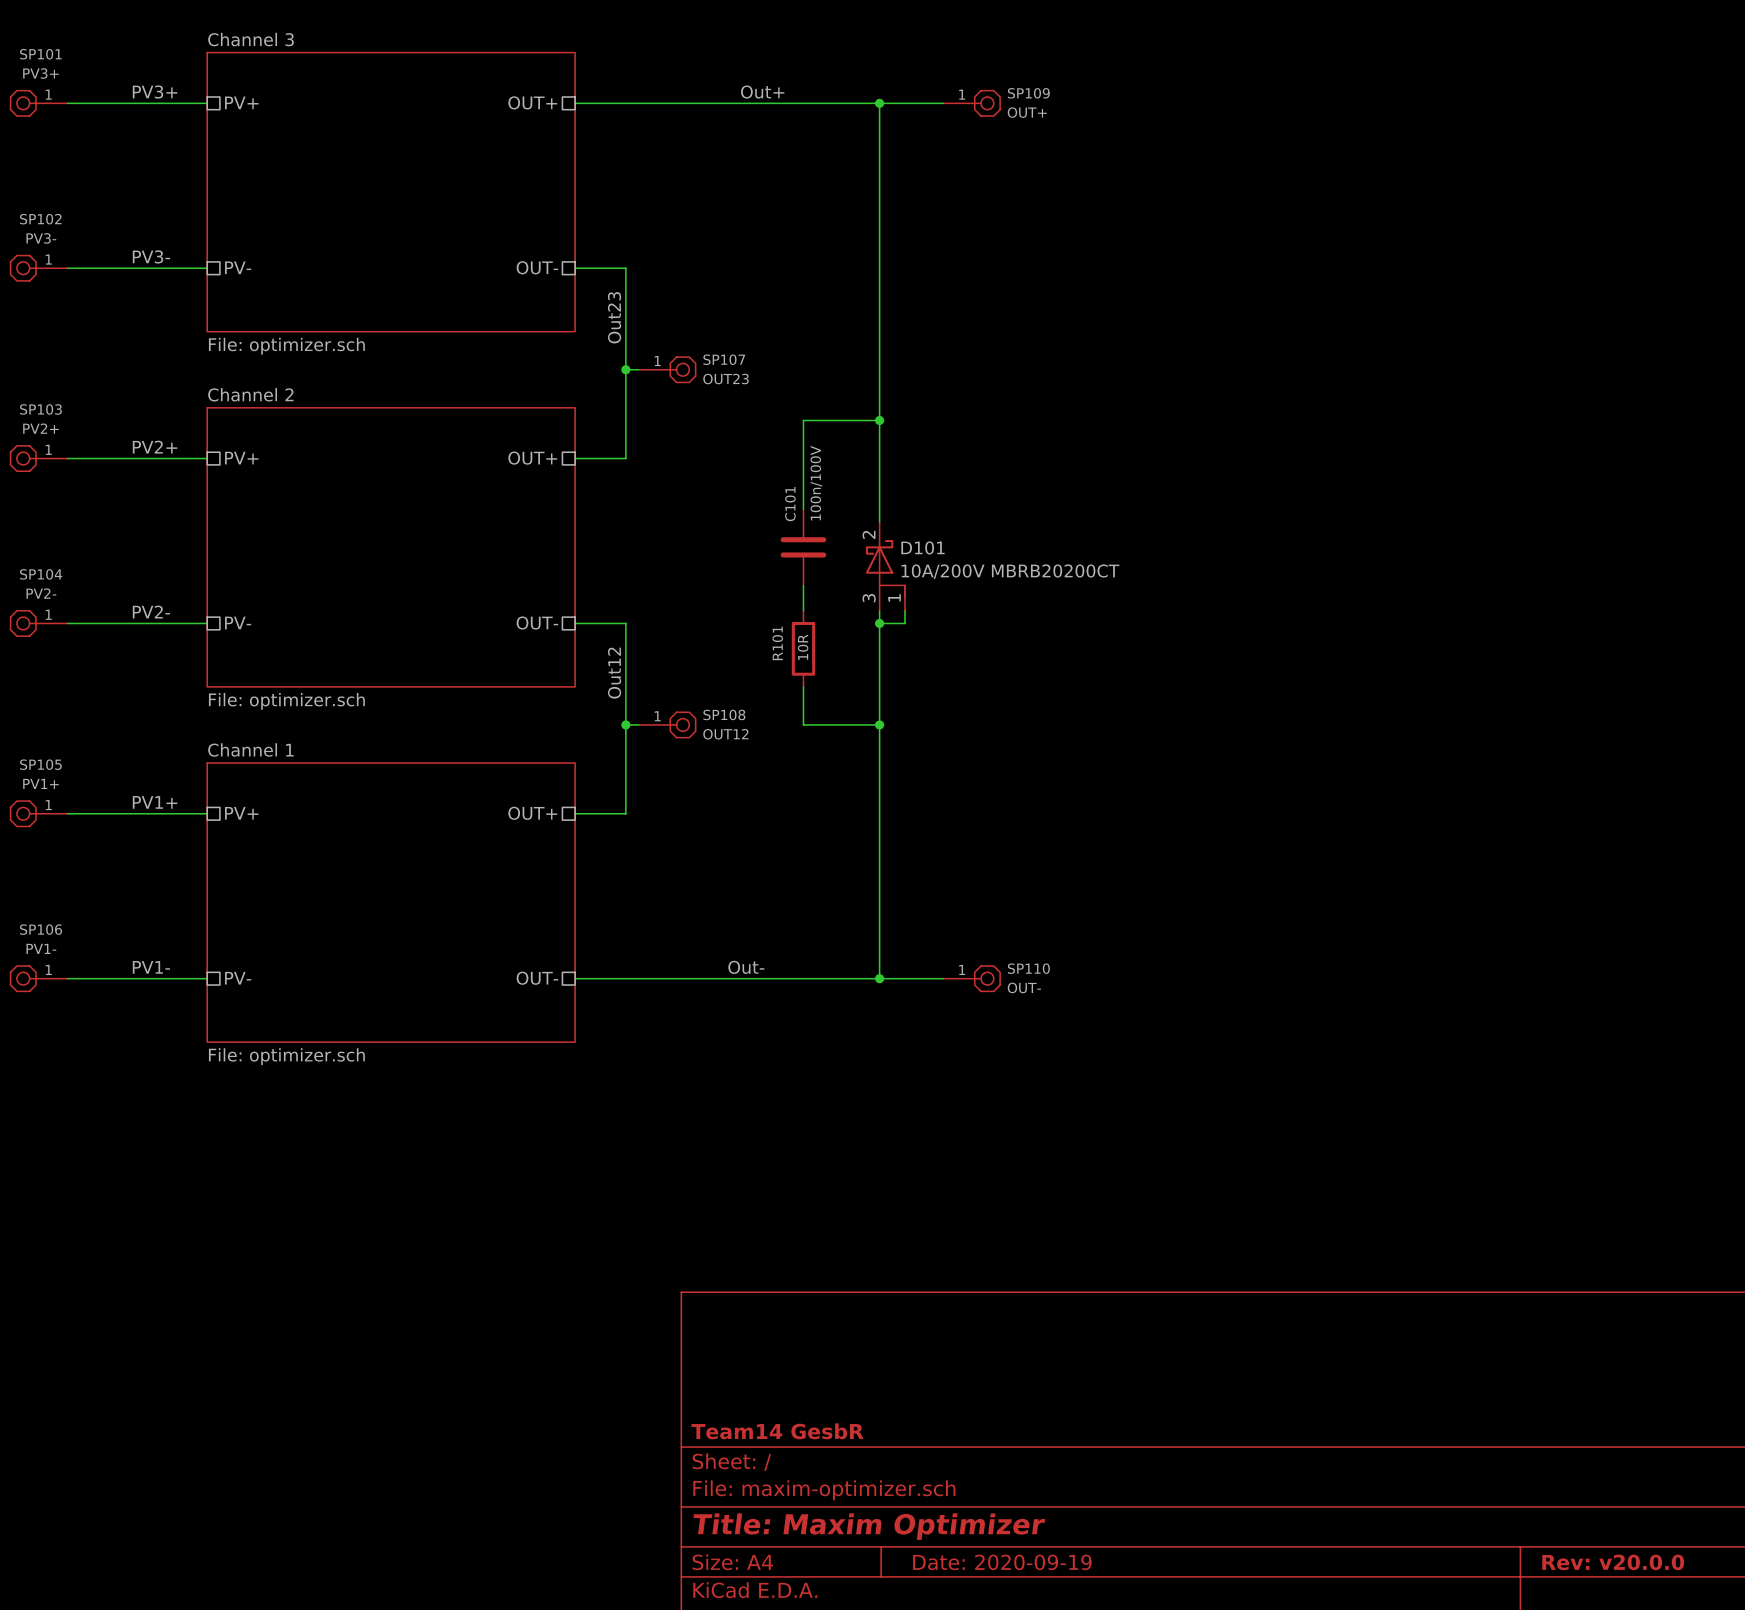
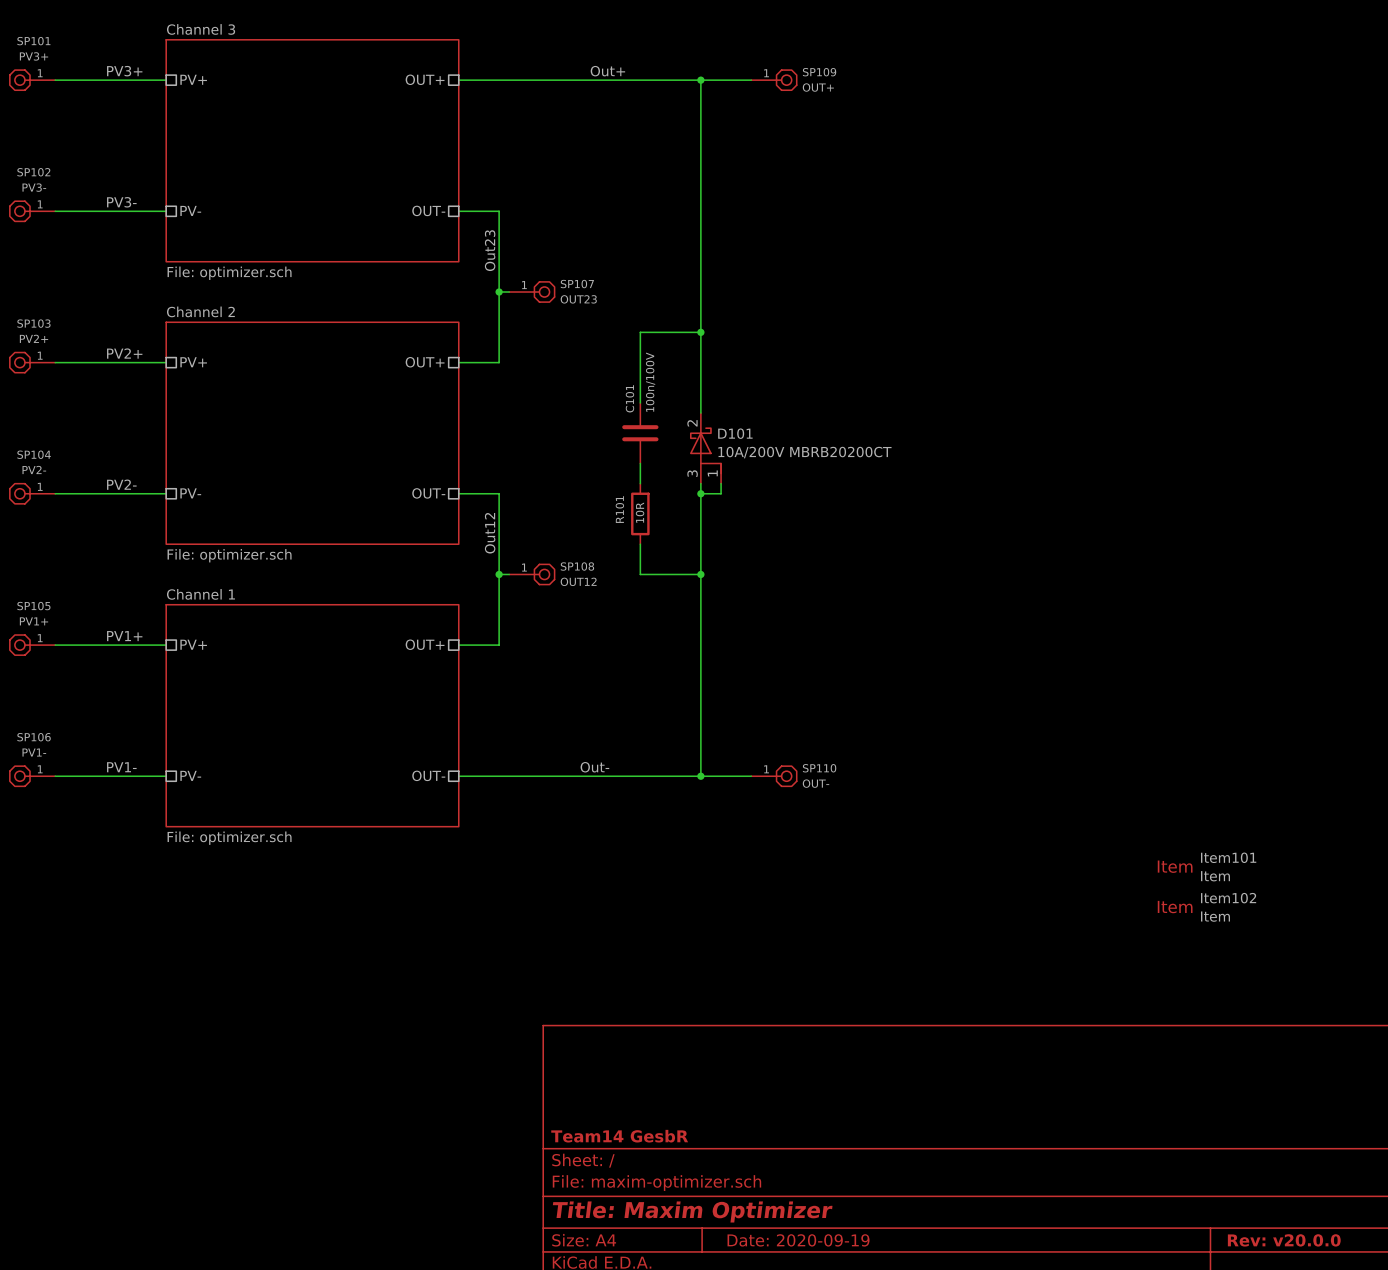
Item101: none -> Item (1207, 866)
Item102: none -> Item (1206, 907)

